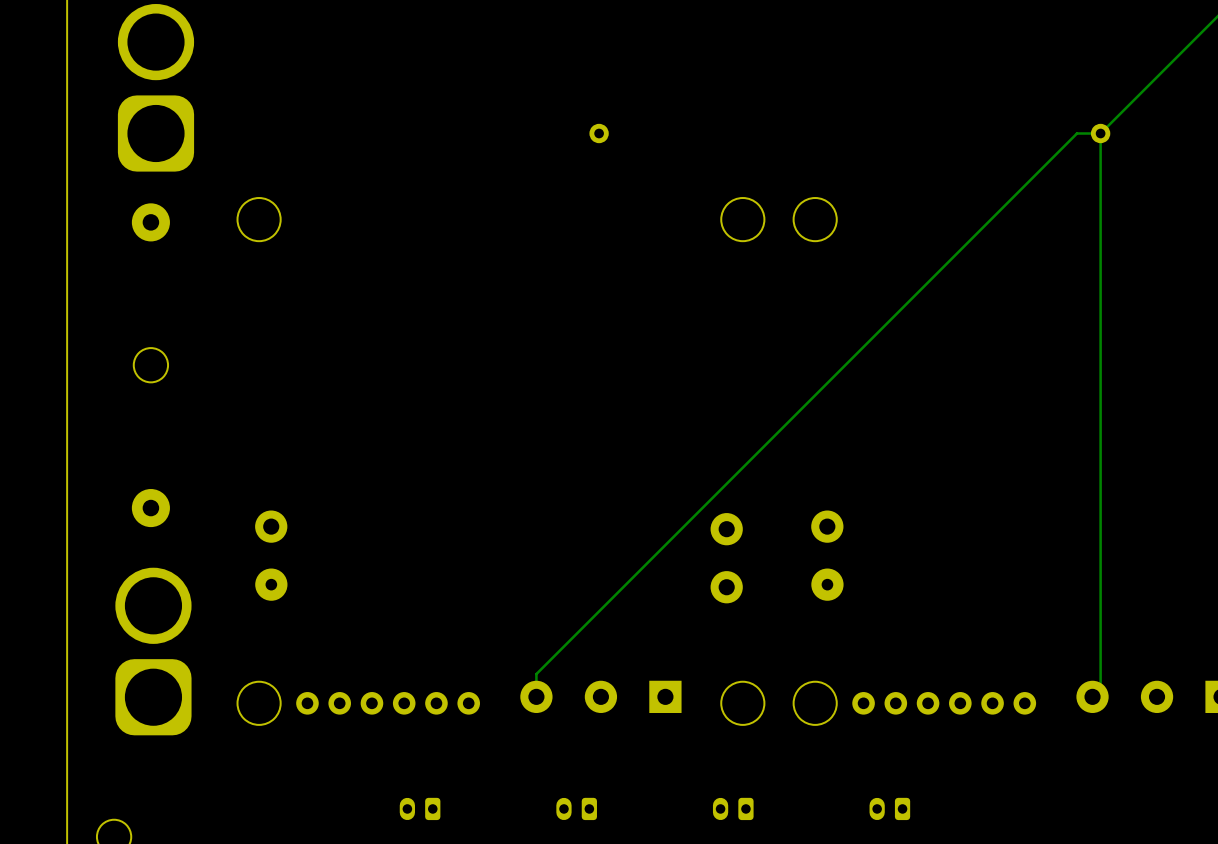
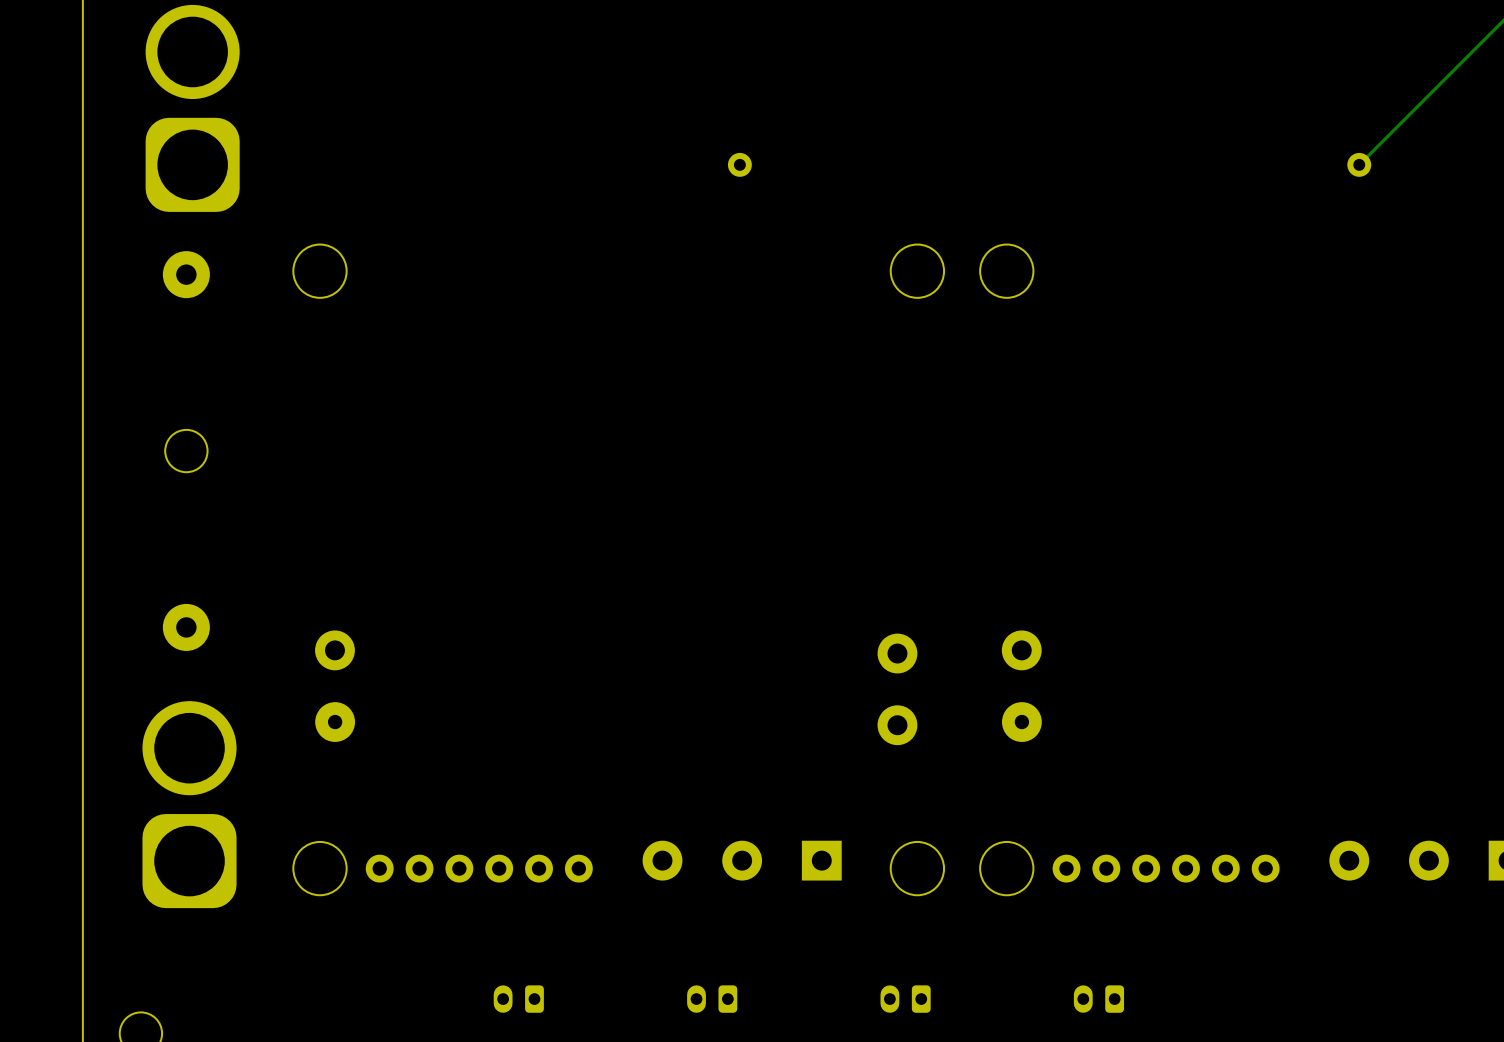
track: (1092, 696) (1100, 688) (1100, 133) (1076, 133) (536, 674) (536, 696) -> none

